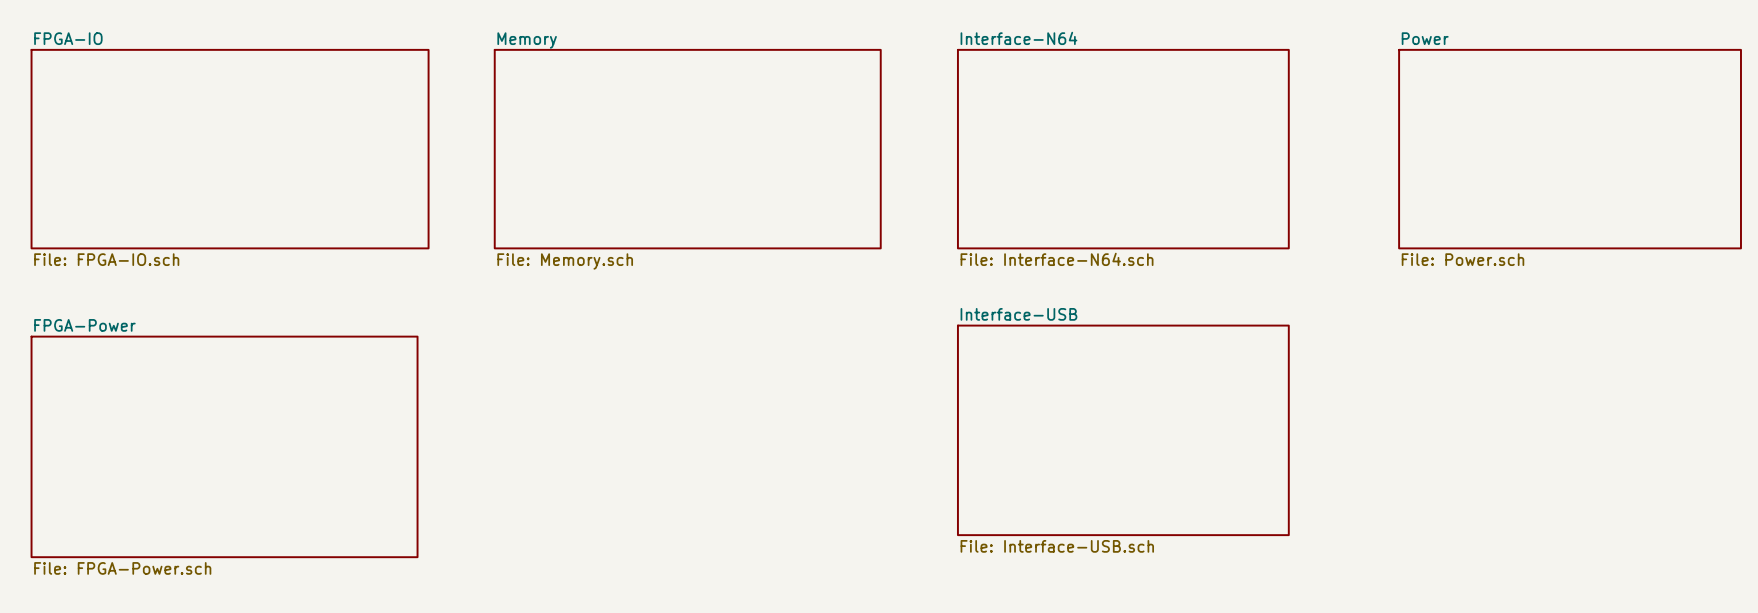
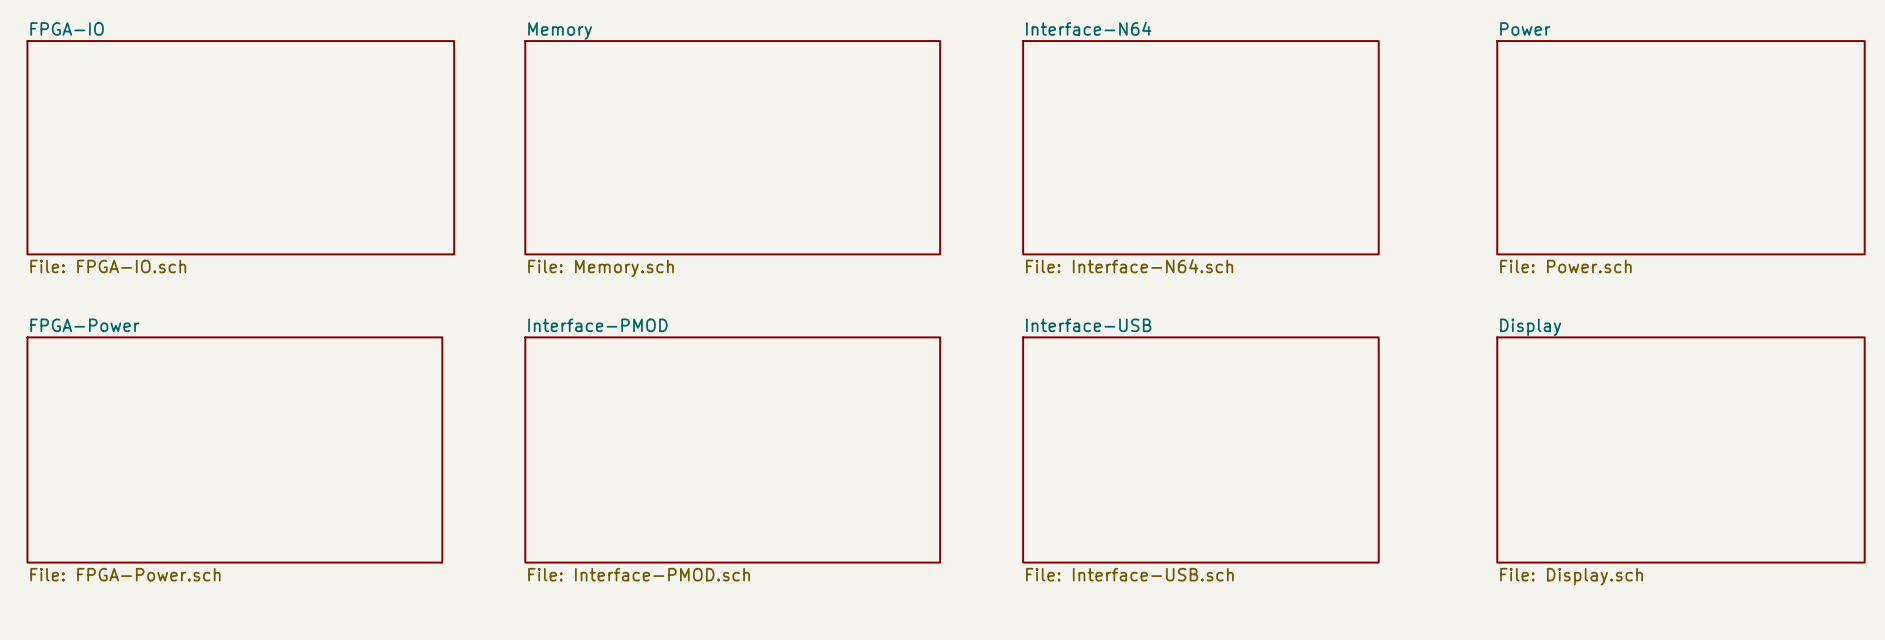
sheet FPGA-Power: none -> File: FPGA-Power.sch (234, 449)
sheet Interface-PMOD: none -> File: Interface-PMOD.sch (732, 449)
sheet Display: none -> File: Display.sch (1680, 449)
sheet FPGA-Power: File: FPGA-Power.sch (224, 446) -> none

